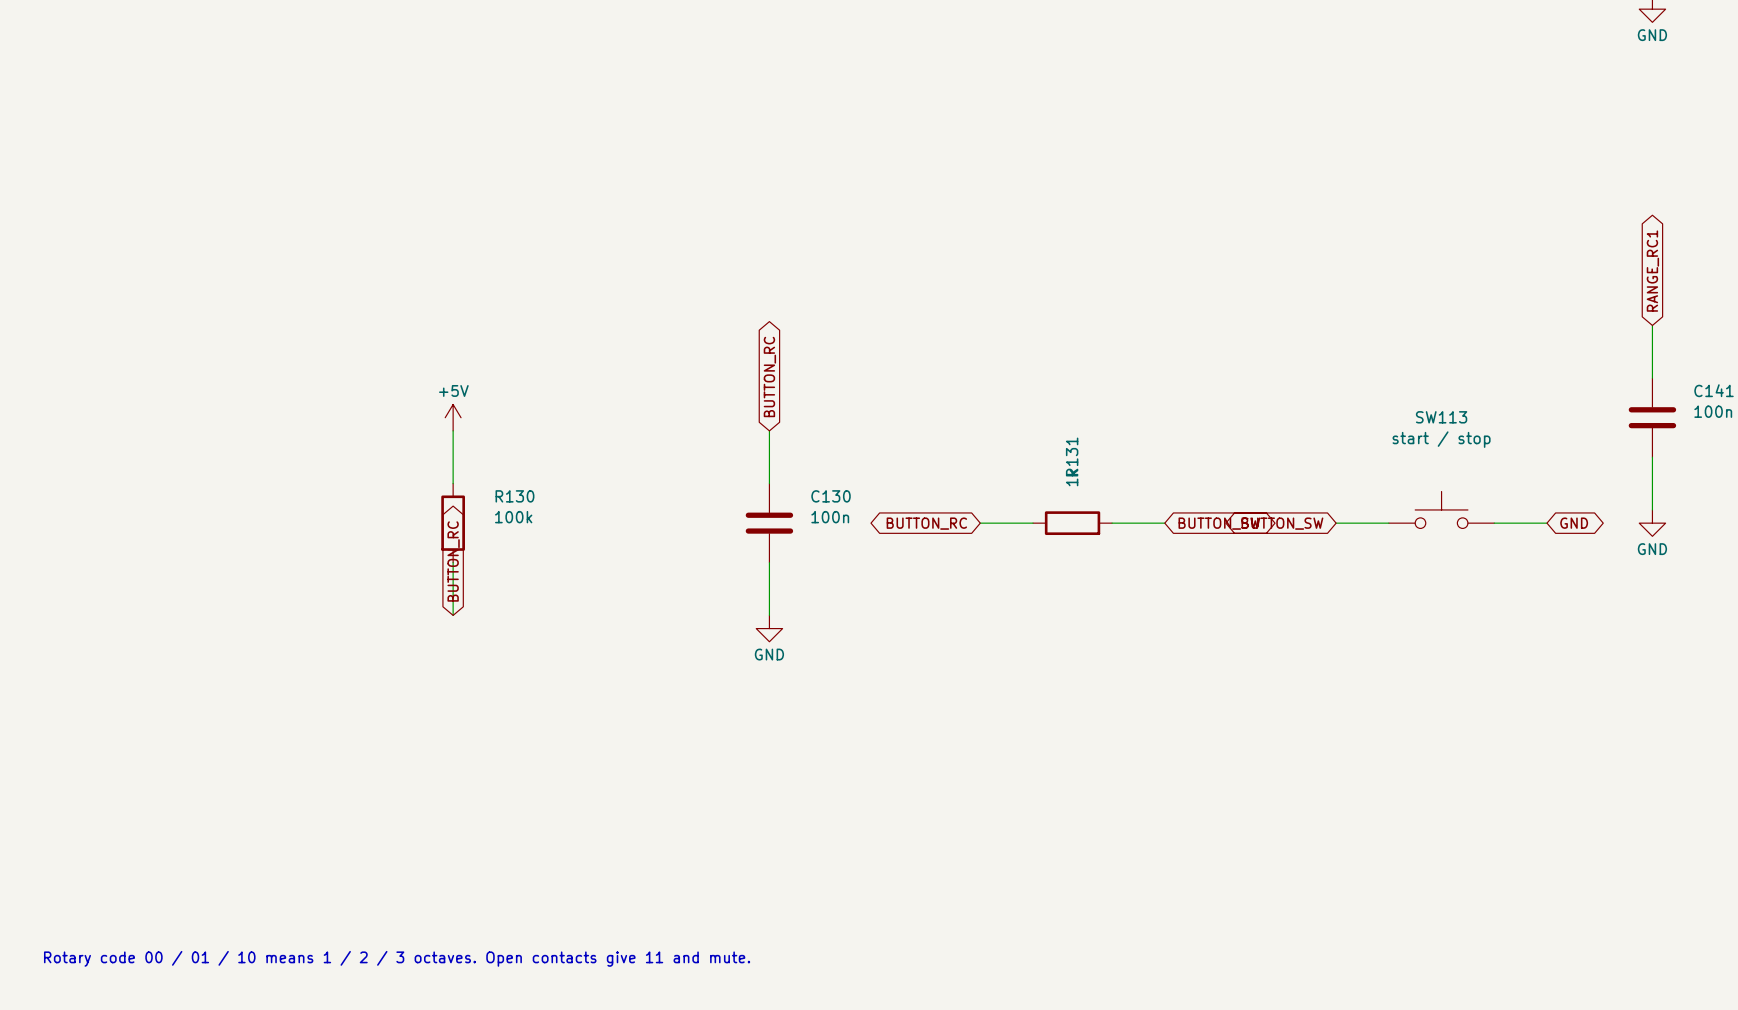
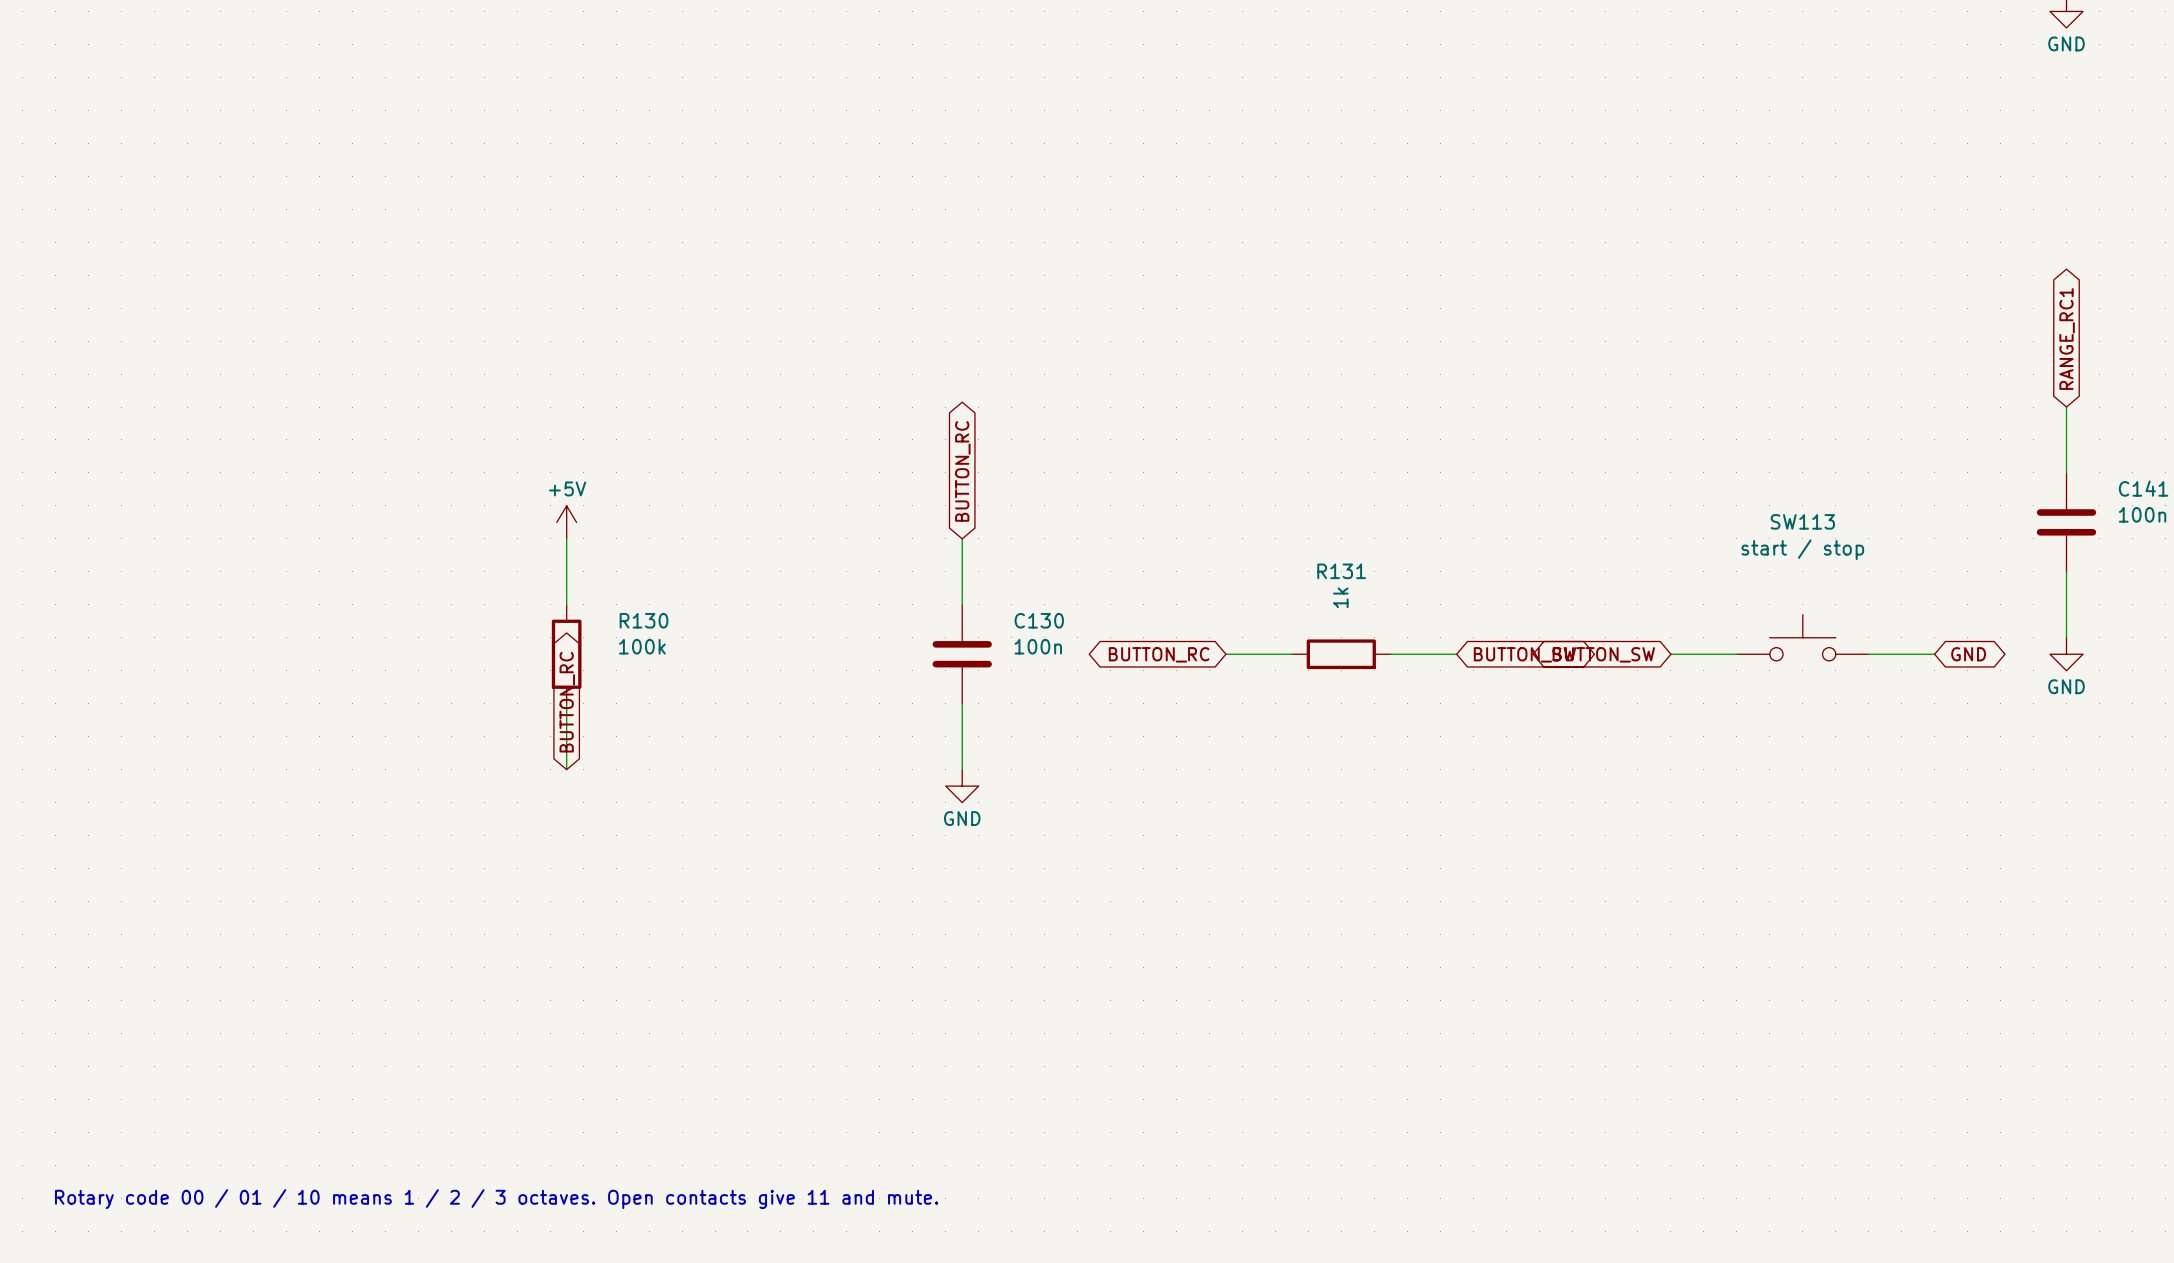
R131 name rotation: 0° (1072, 456) -> 90° clockwise (1341, 571)

